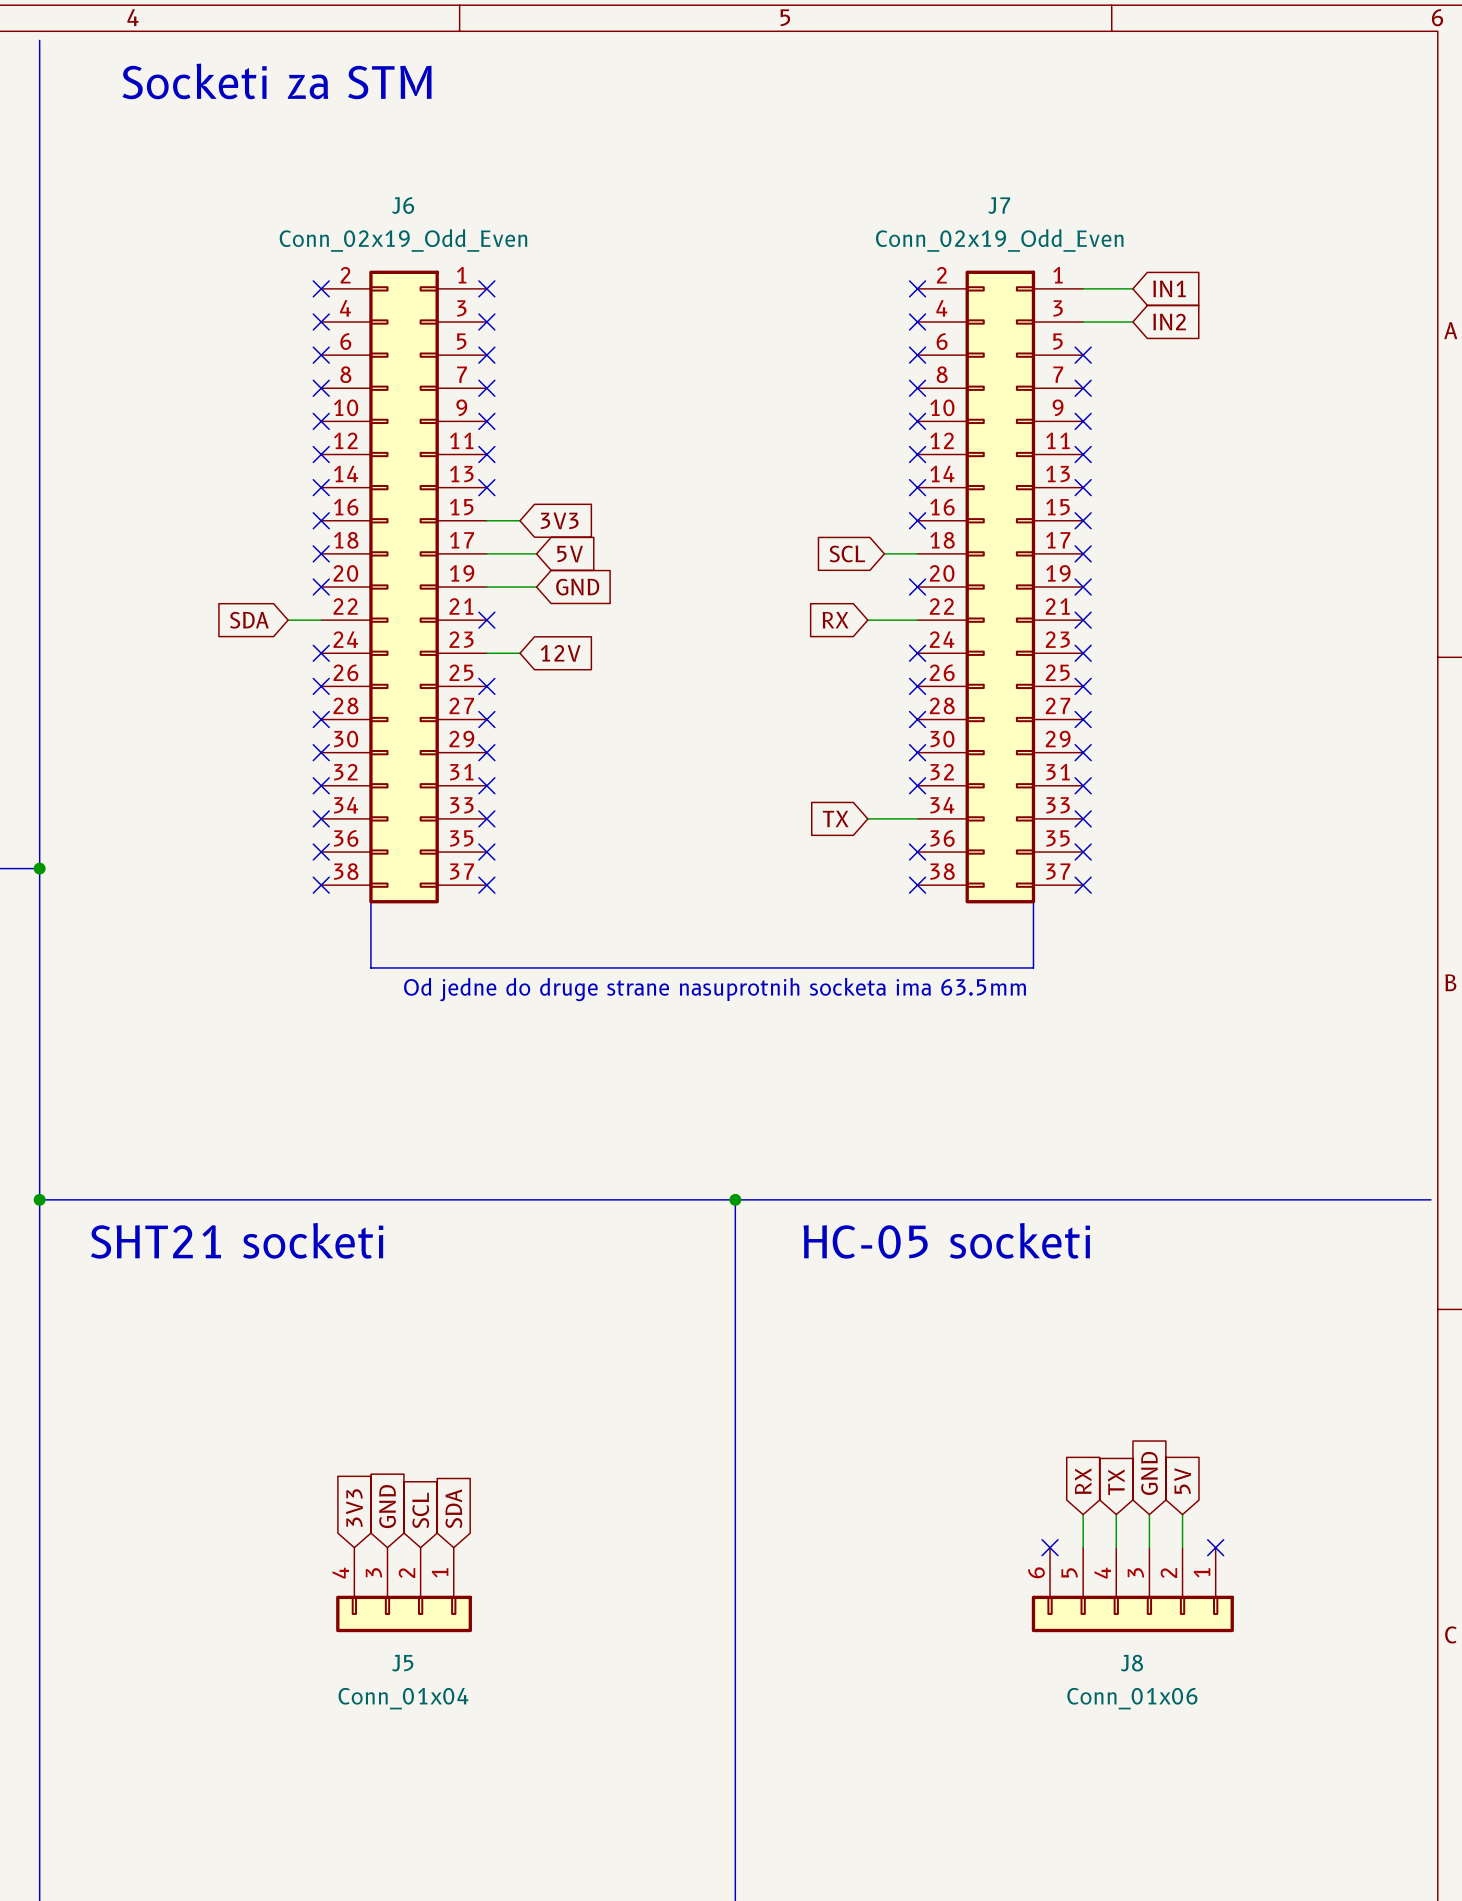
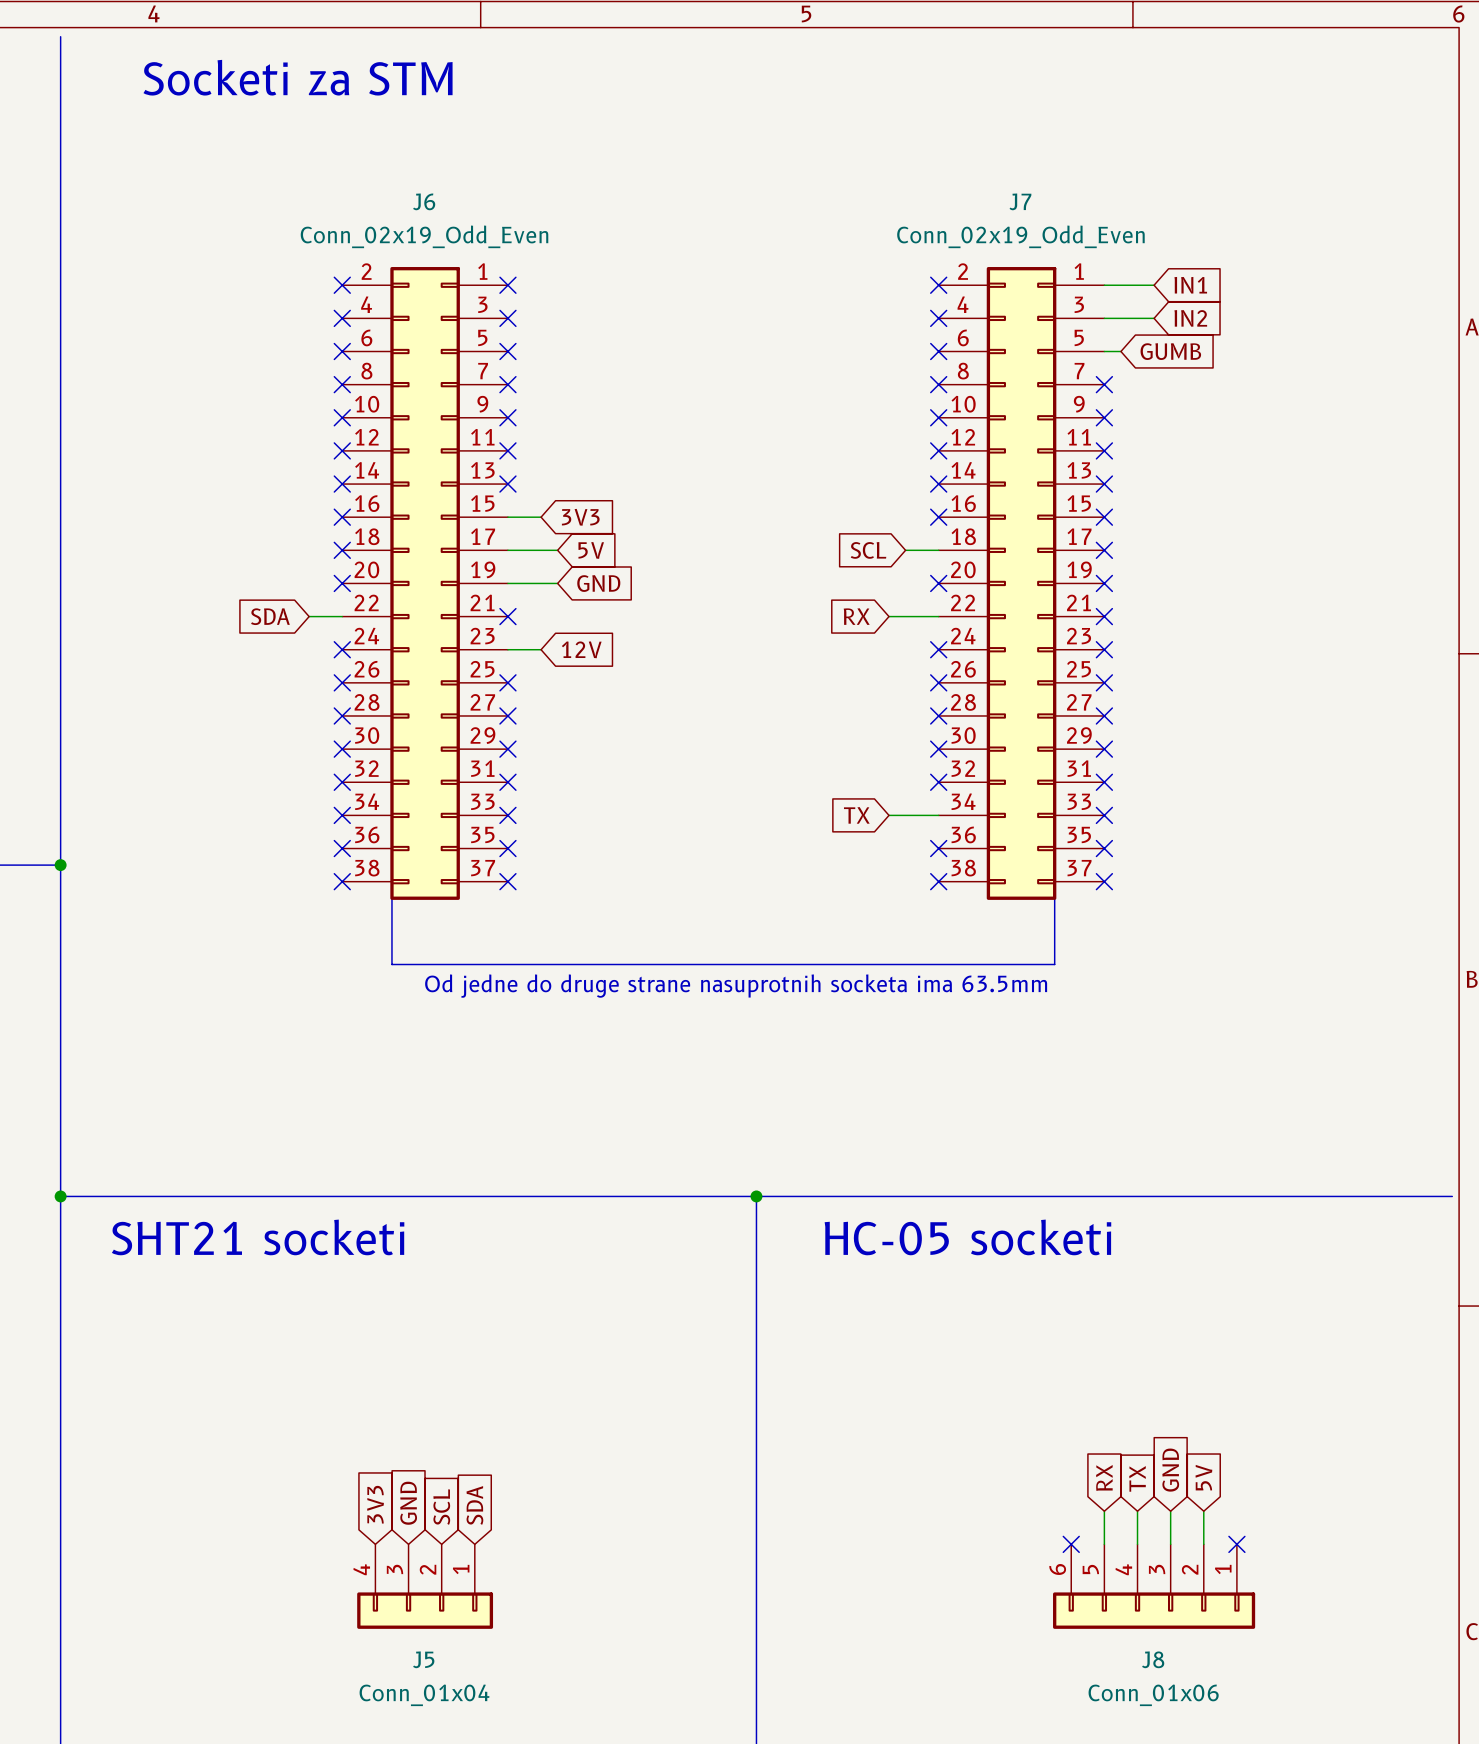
wire: none -> (1104, 351) (1120, 351)
no-connect mark: (1083, 355) -> none
global label: none -> GUMB (1170, 351)

